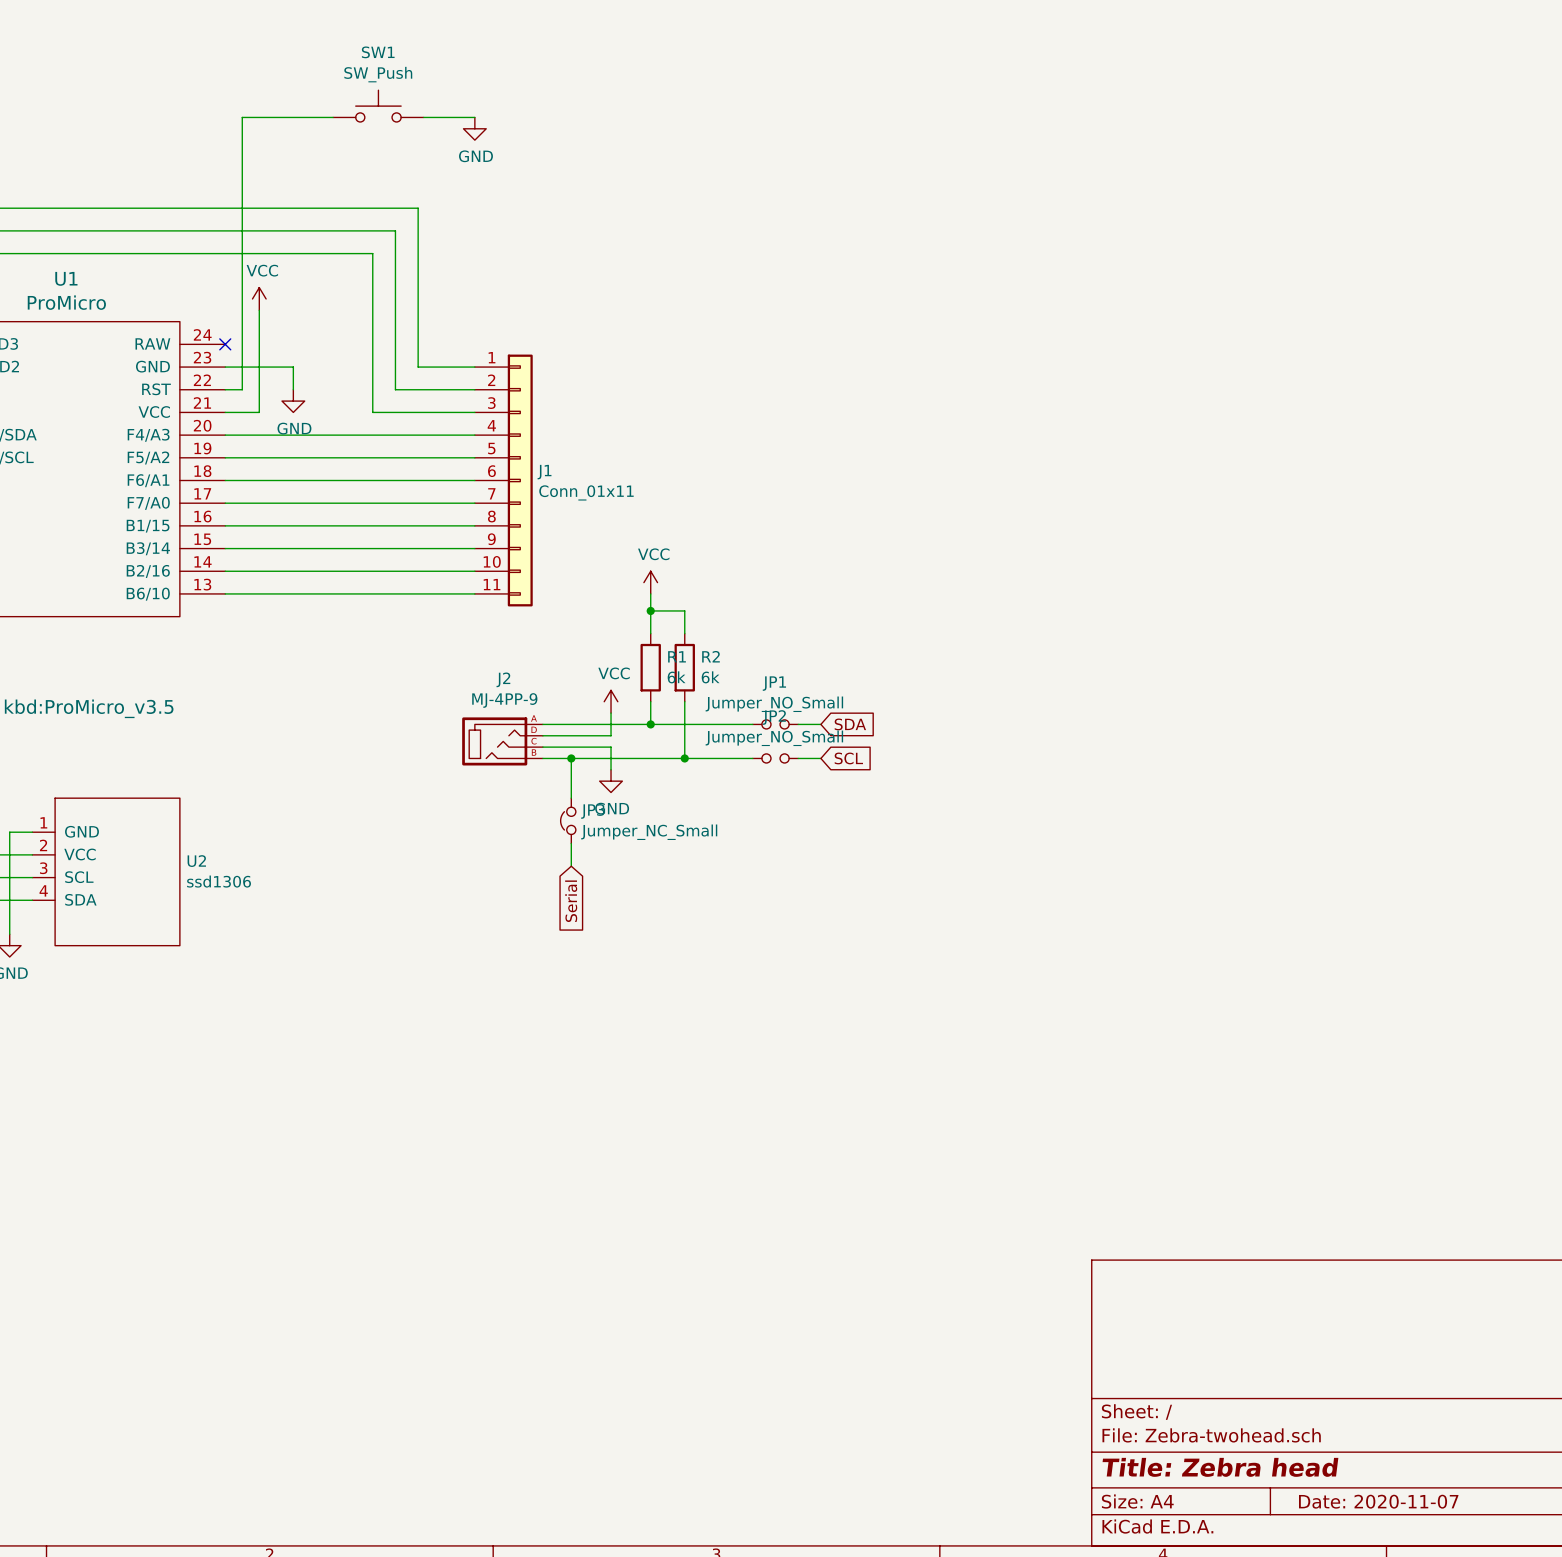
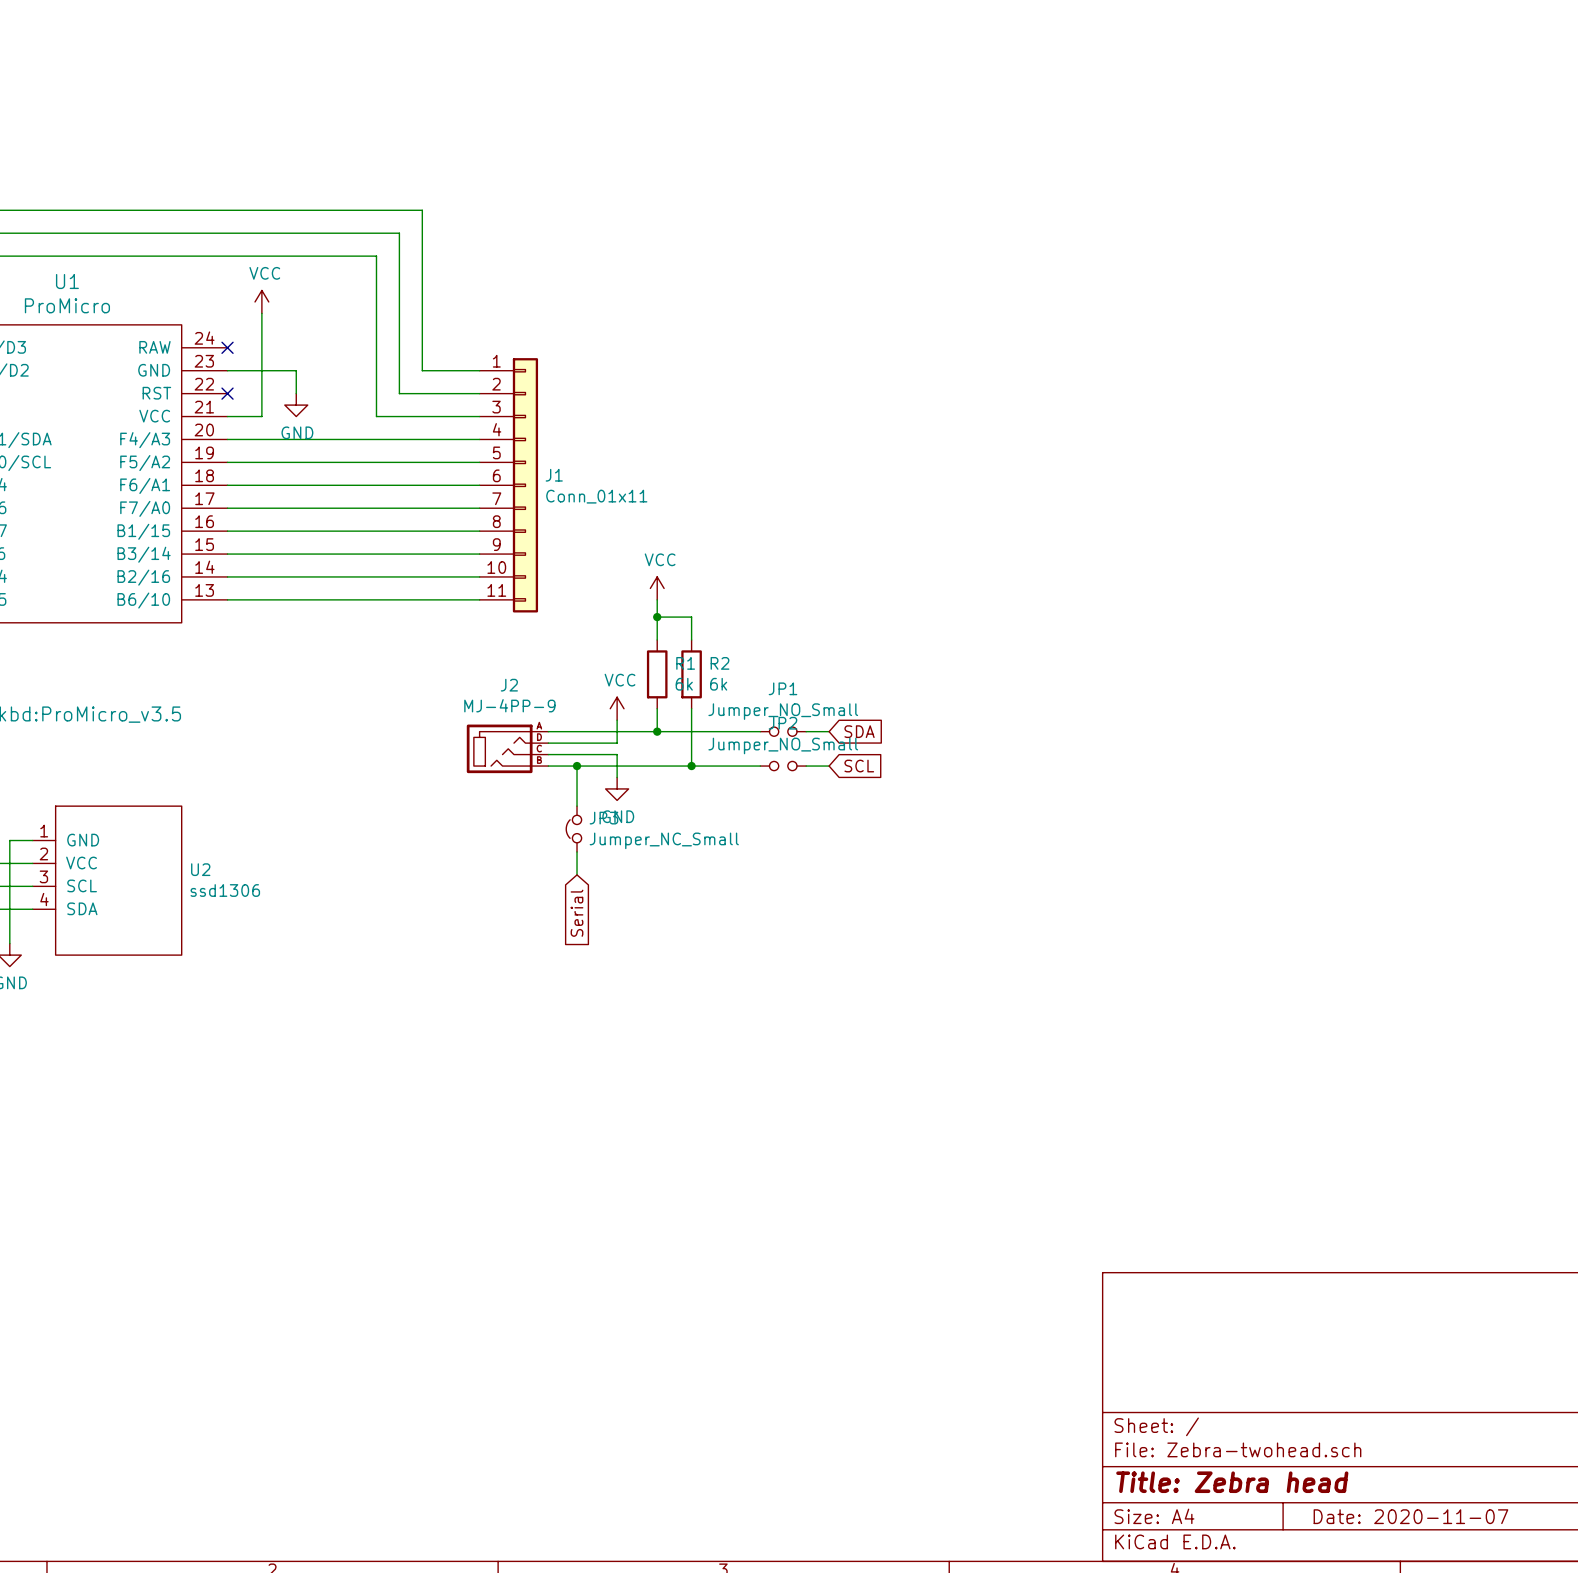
SW1: SW_Push (378, 106) -> none
wire: (333, 117) (242, 117) (242, 389) (225, 389) -> none
wire: (423, 117) (474, 117) -> none
power symbol: GND (474, 128) -> none
no-connect mark: none -> (227, 393)

